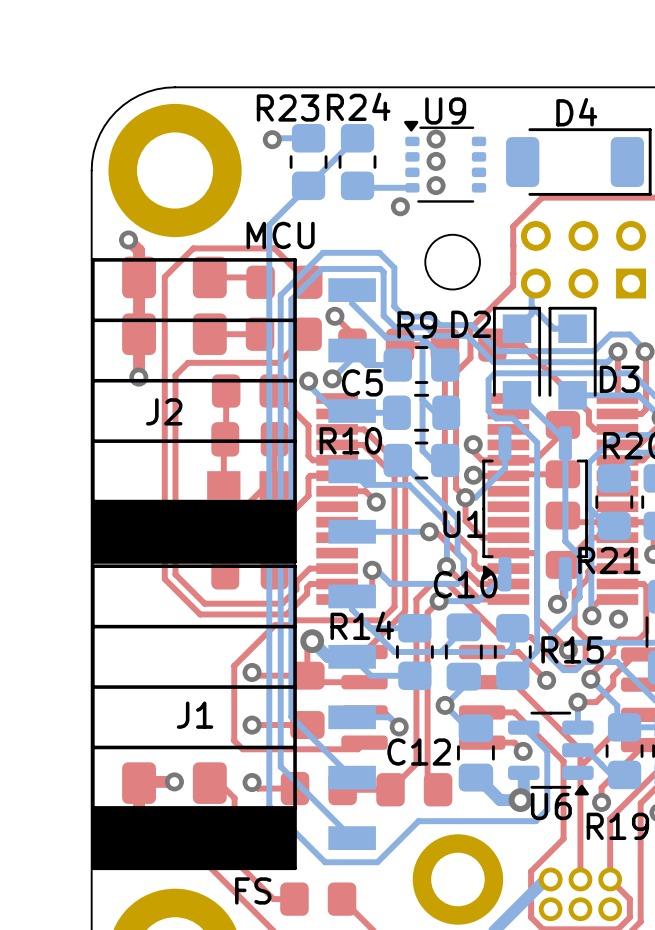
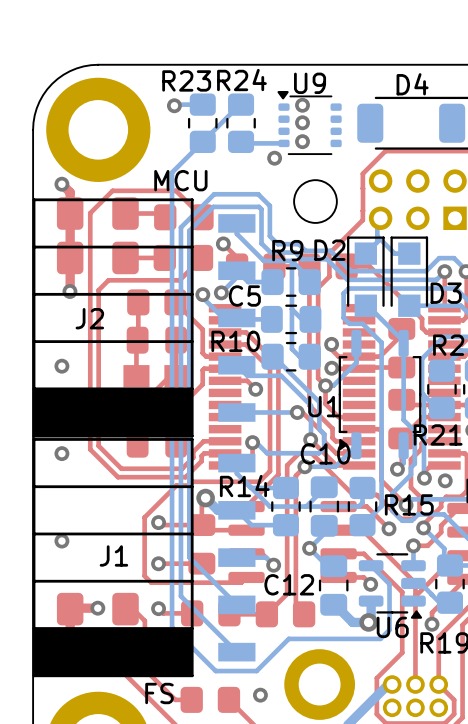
via: none -> (61, 366)
via: none -> (61, 453)
via: none -> (61, 541)
via: none -> (260, 695)

